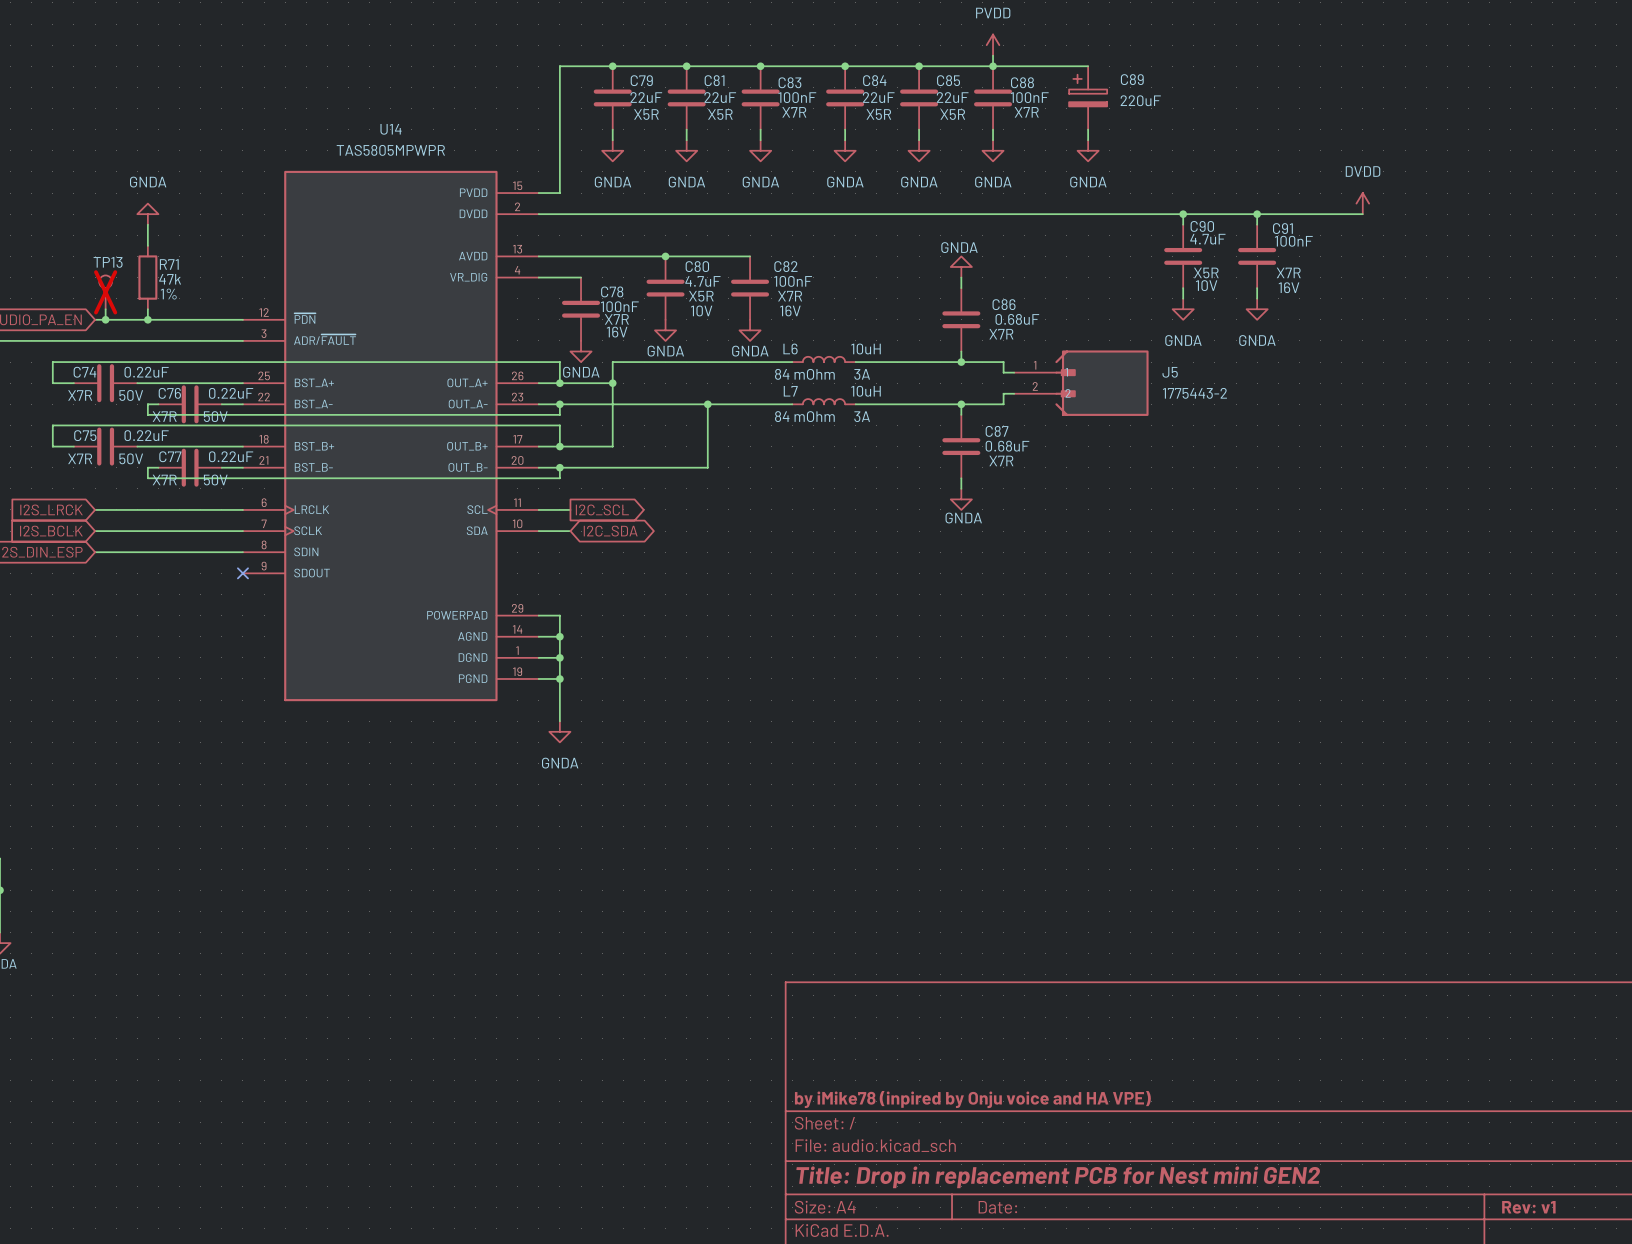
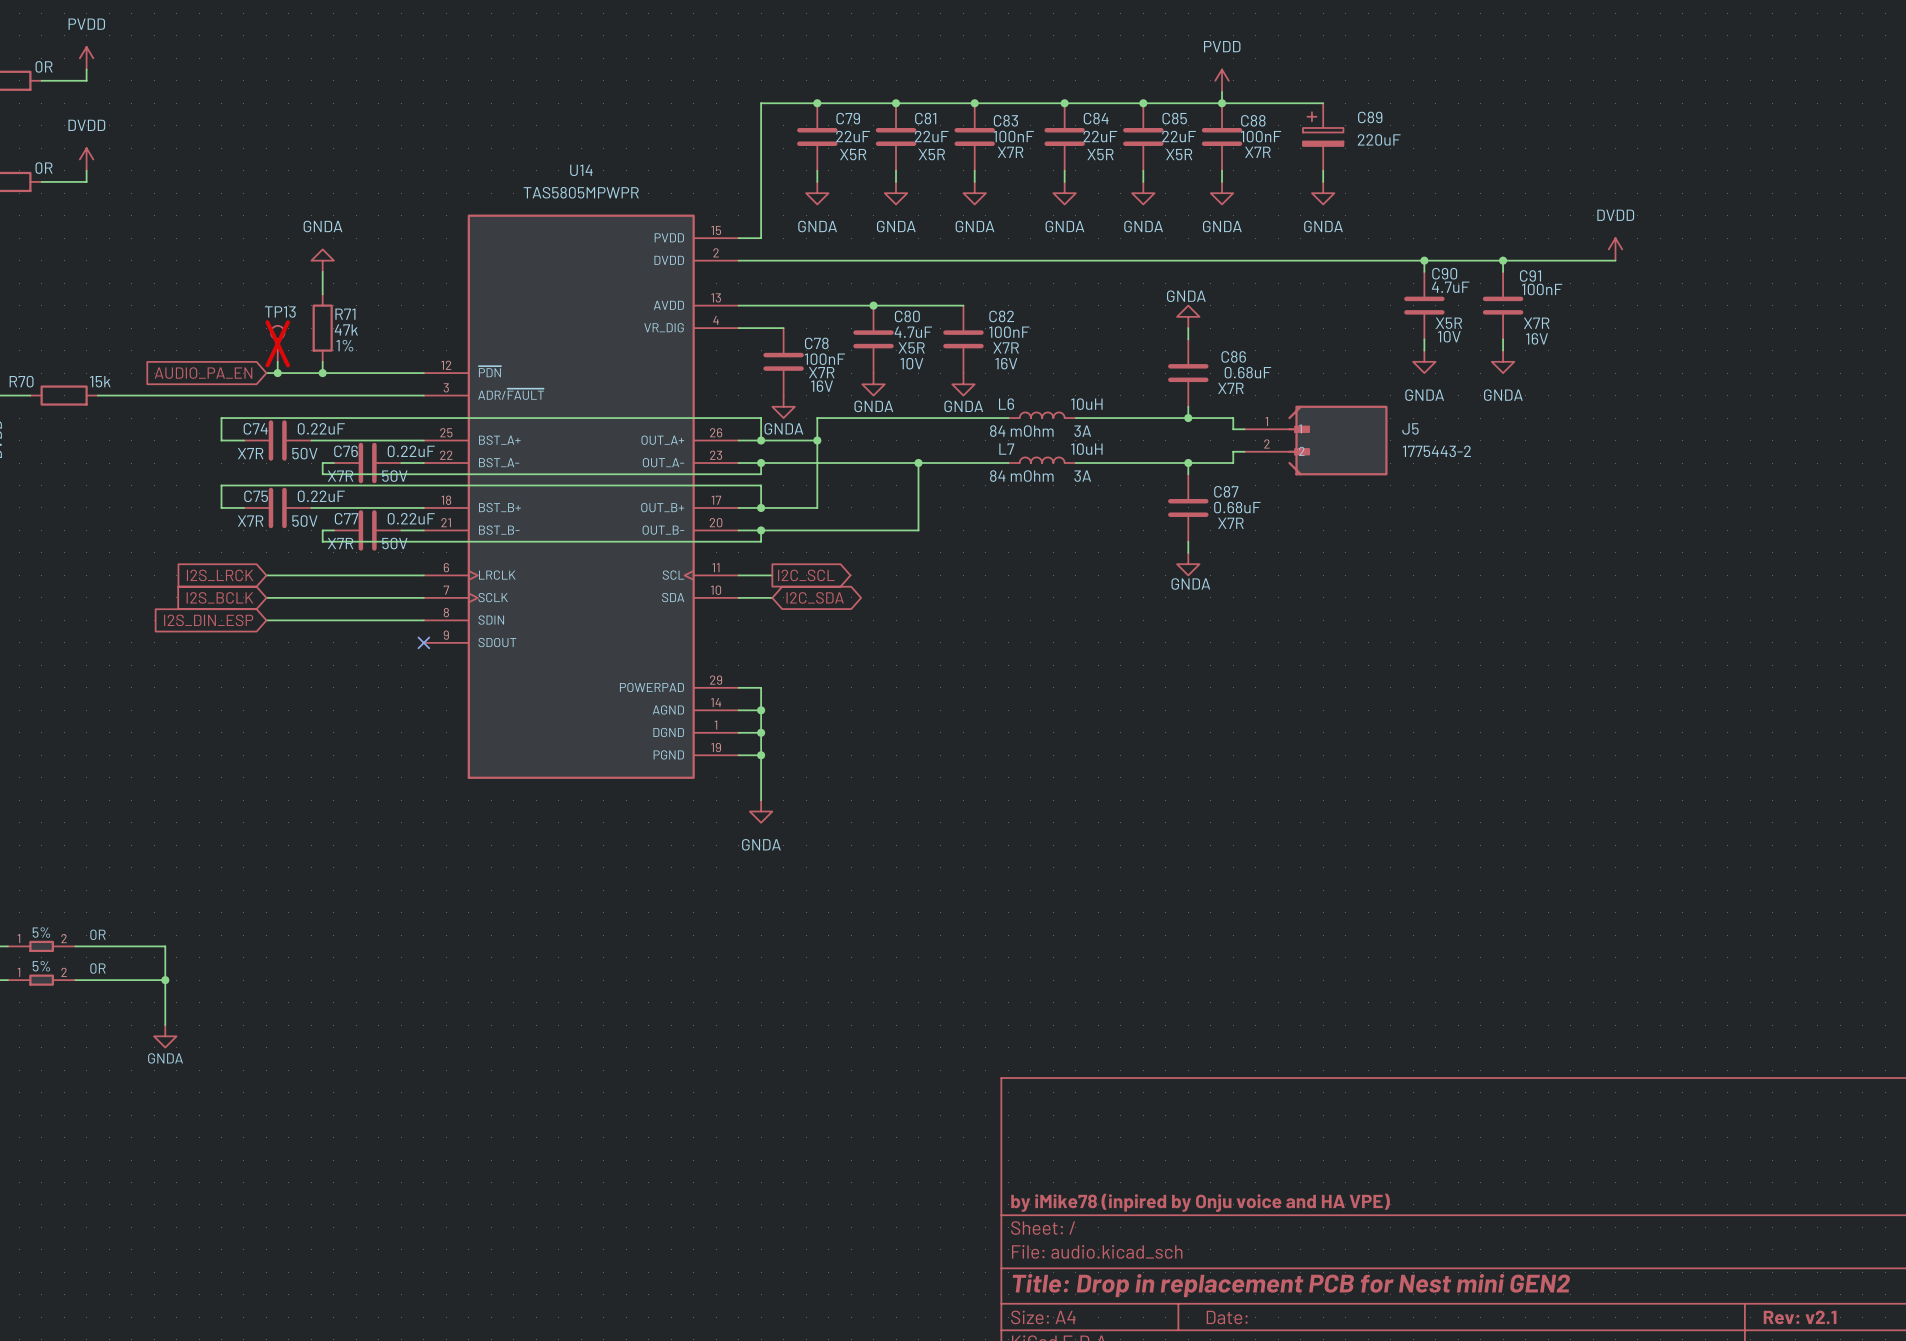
title block: Rev: v1 (1528, 1207) -> Rev: v2.1 (1800, 1317)

